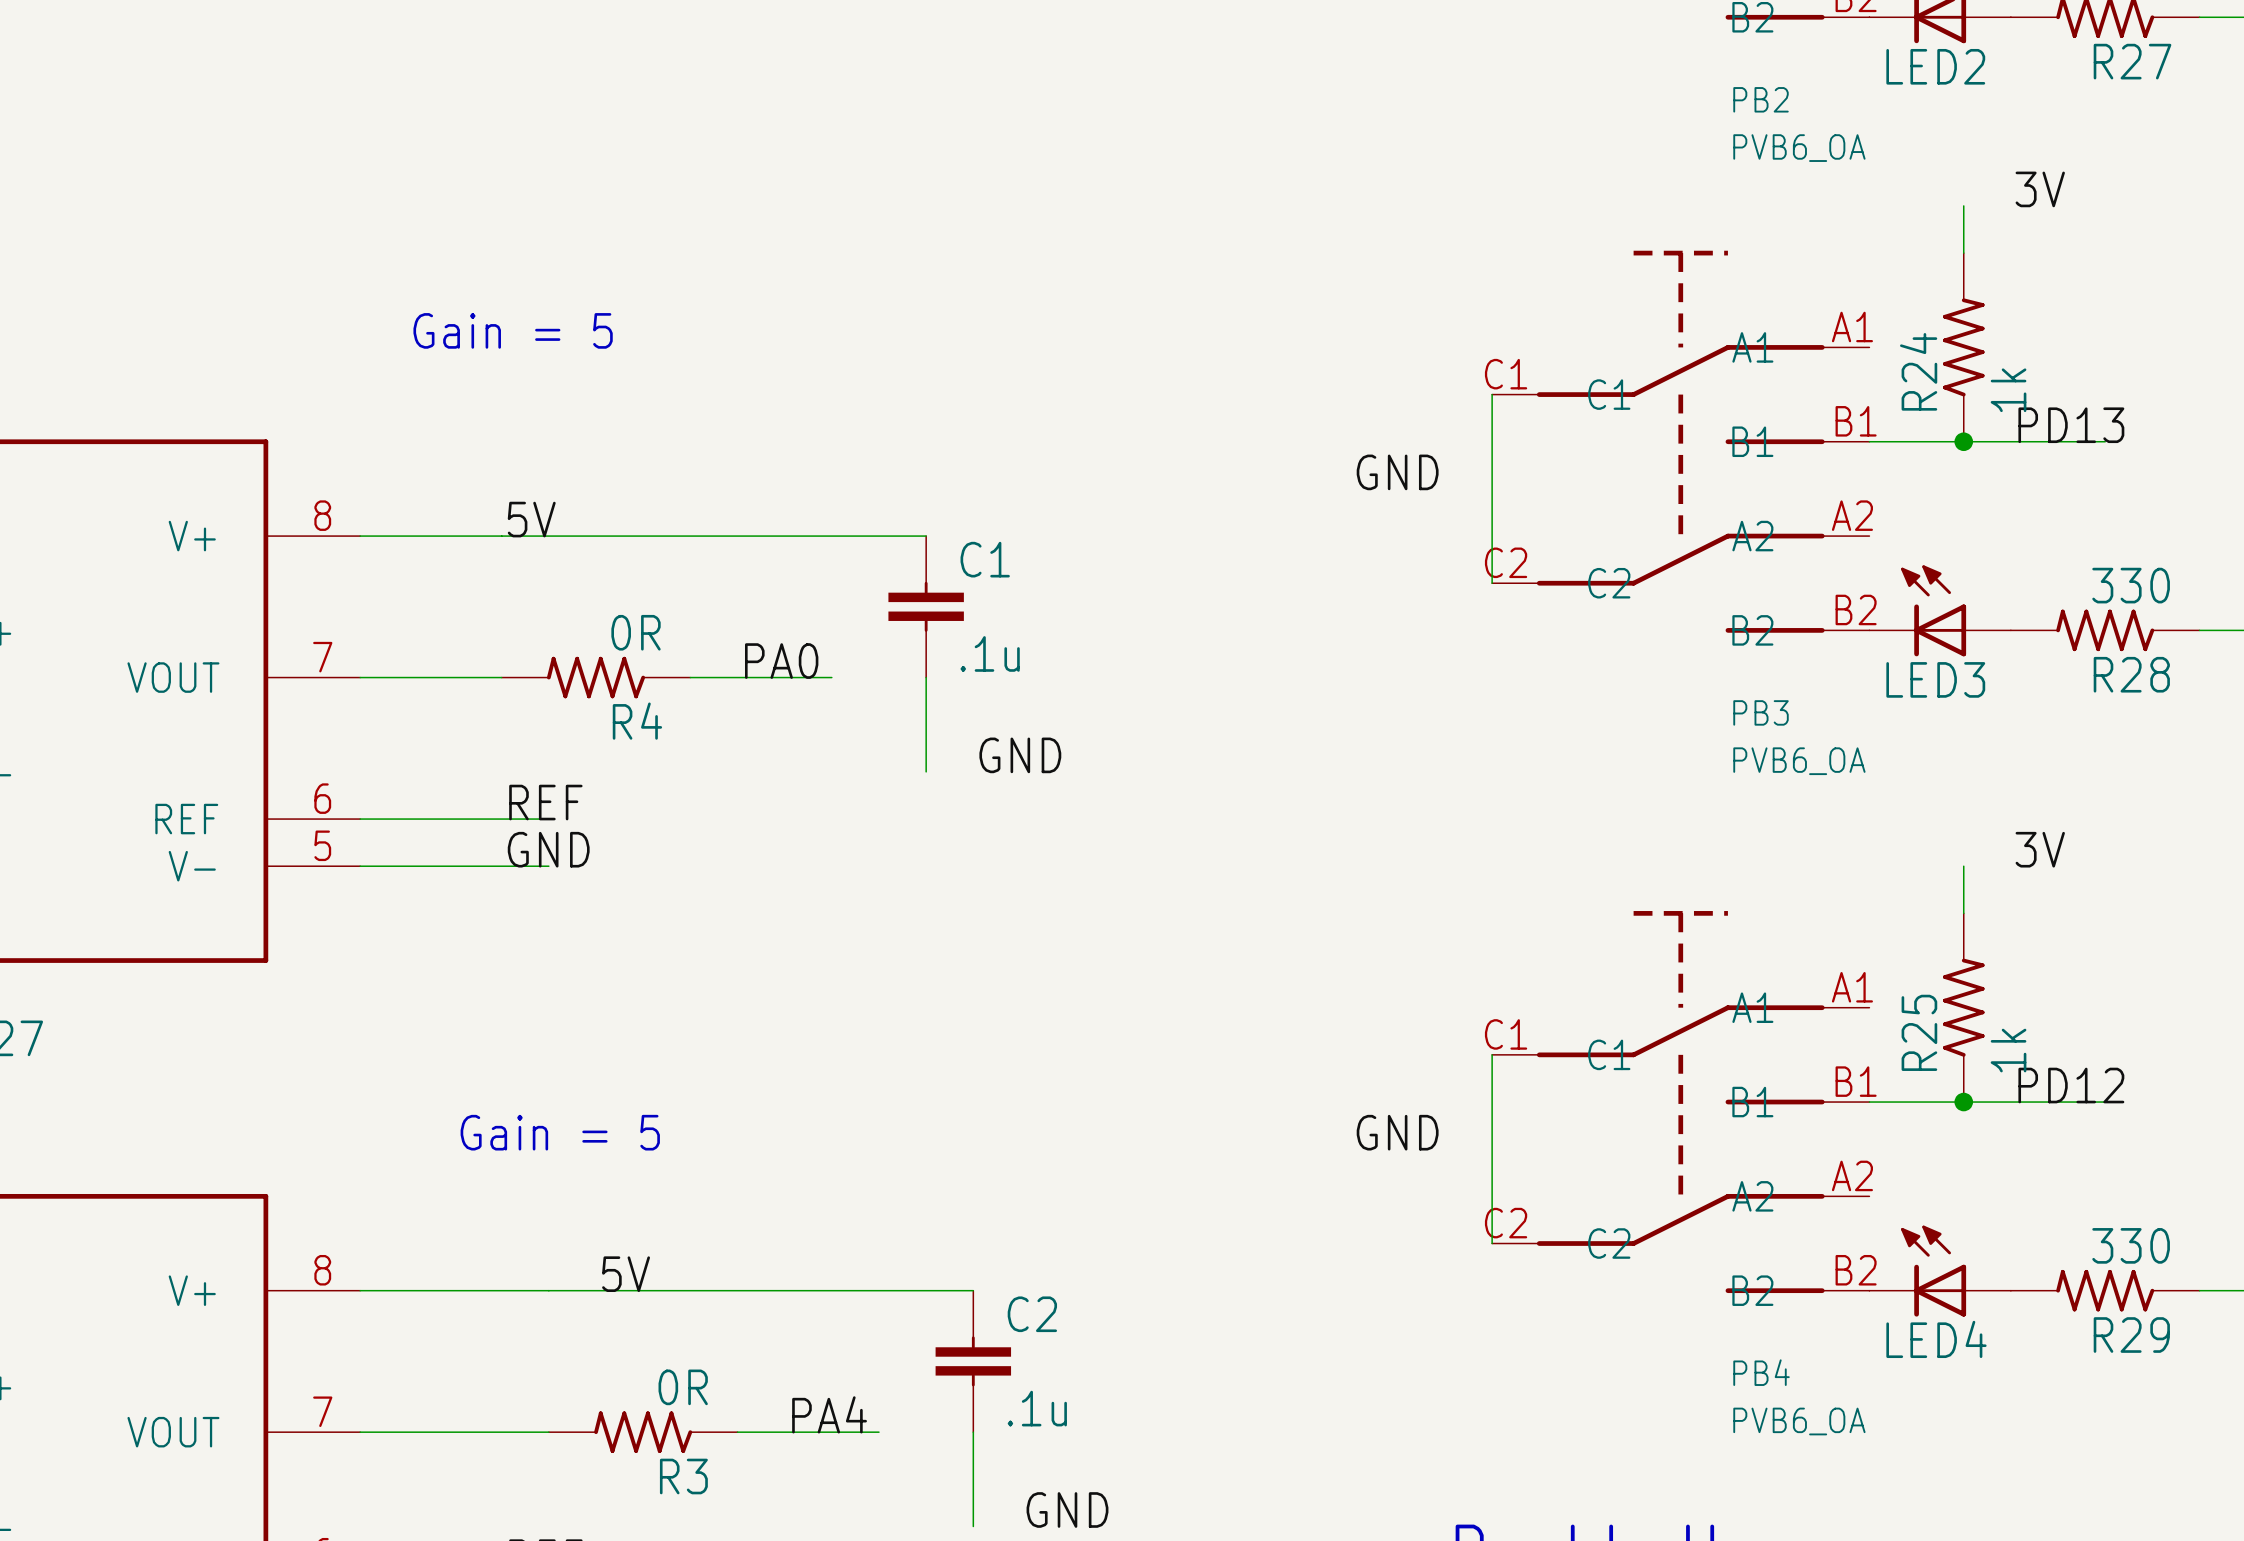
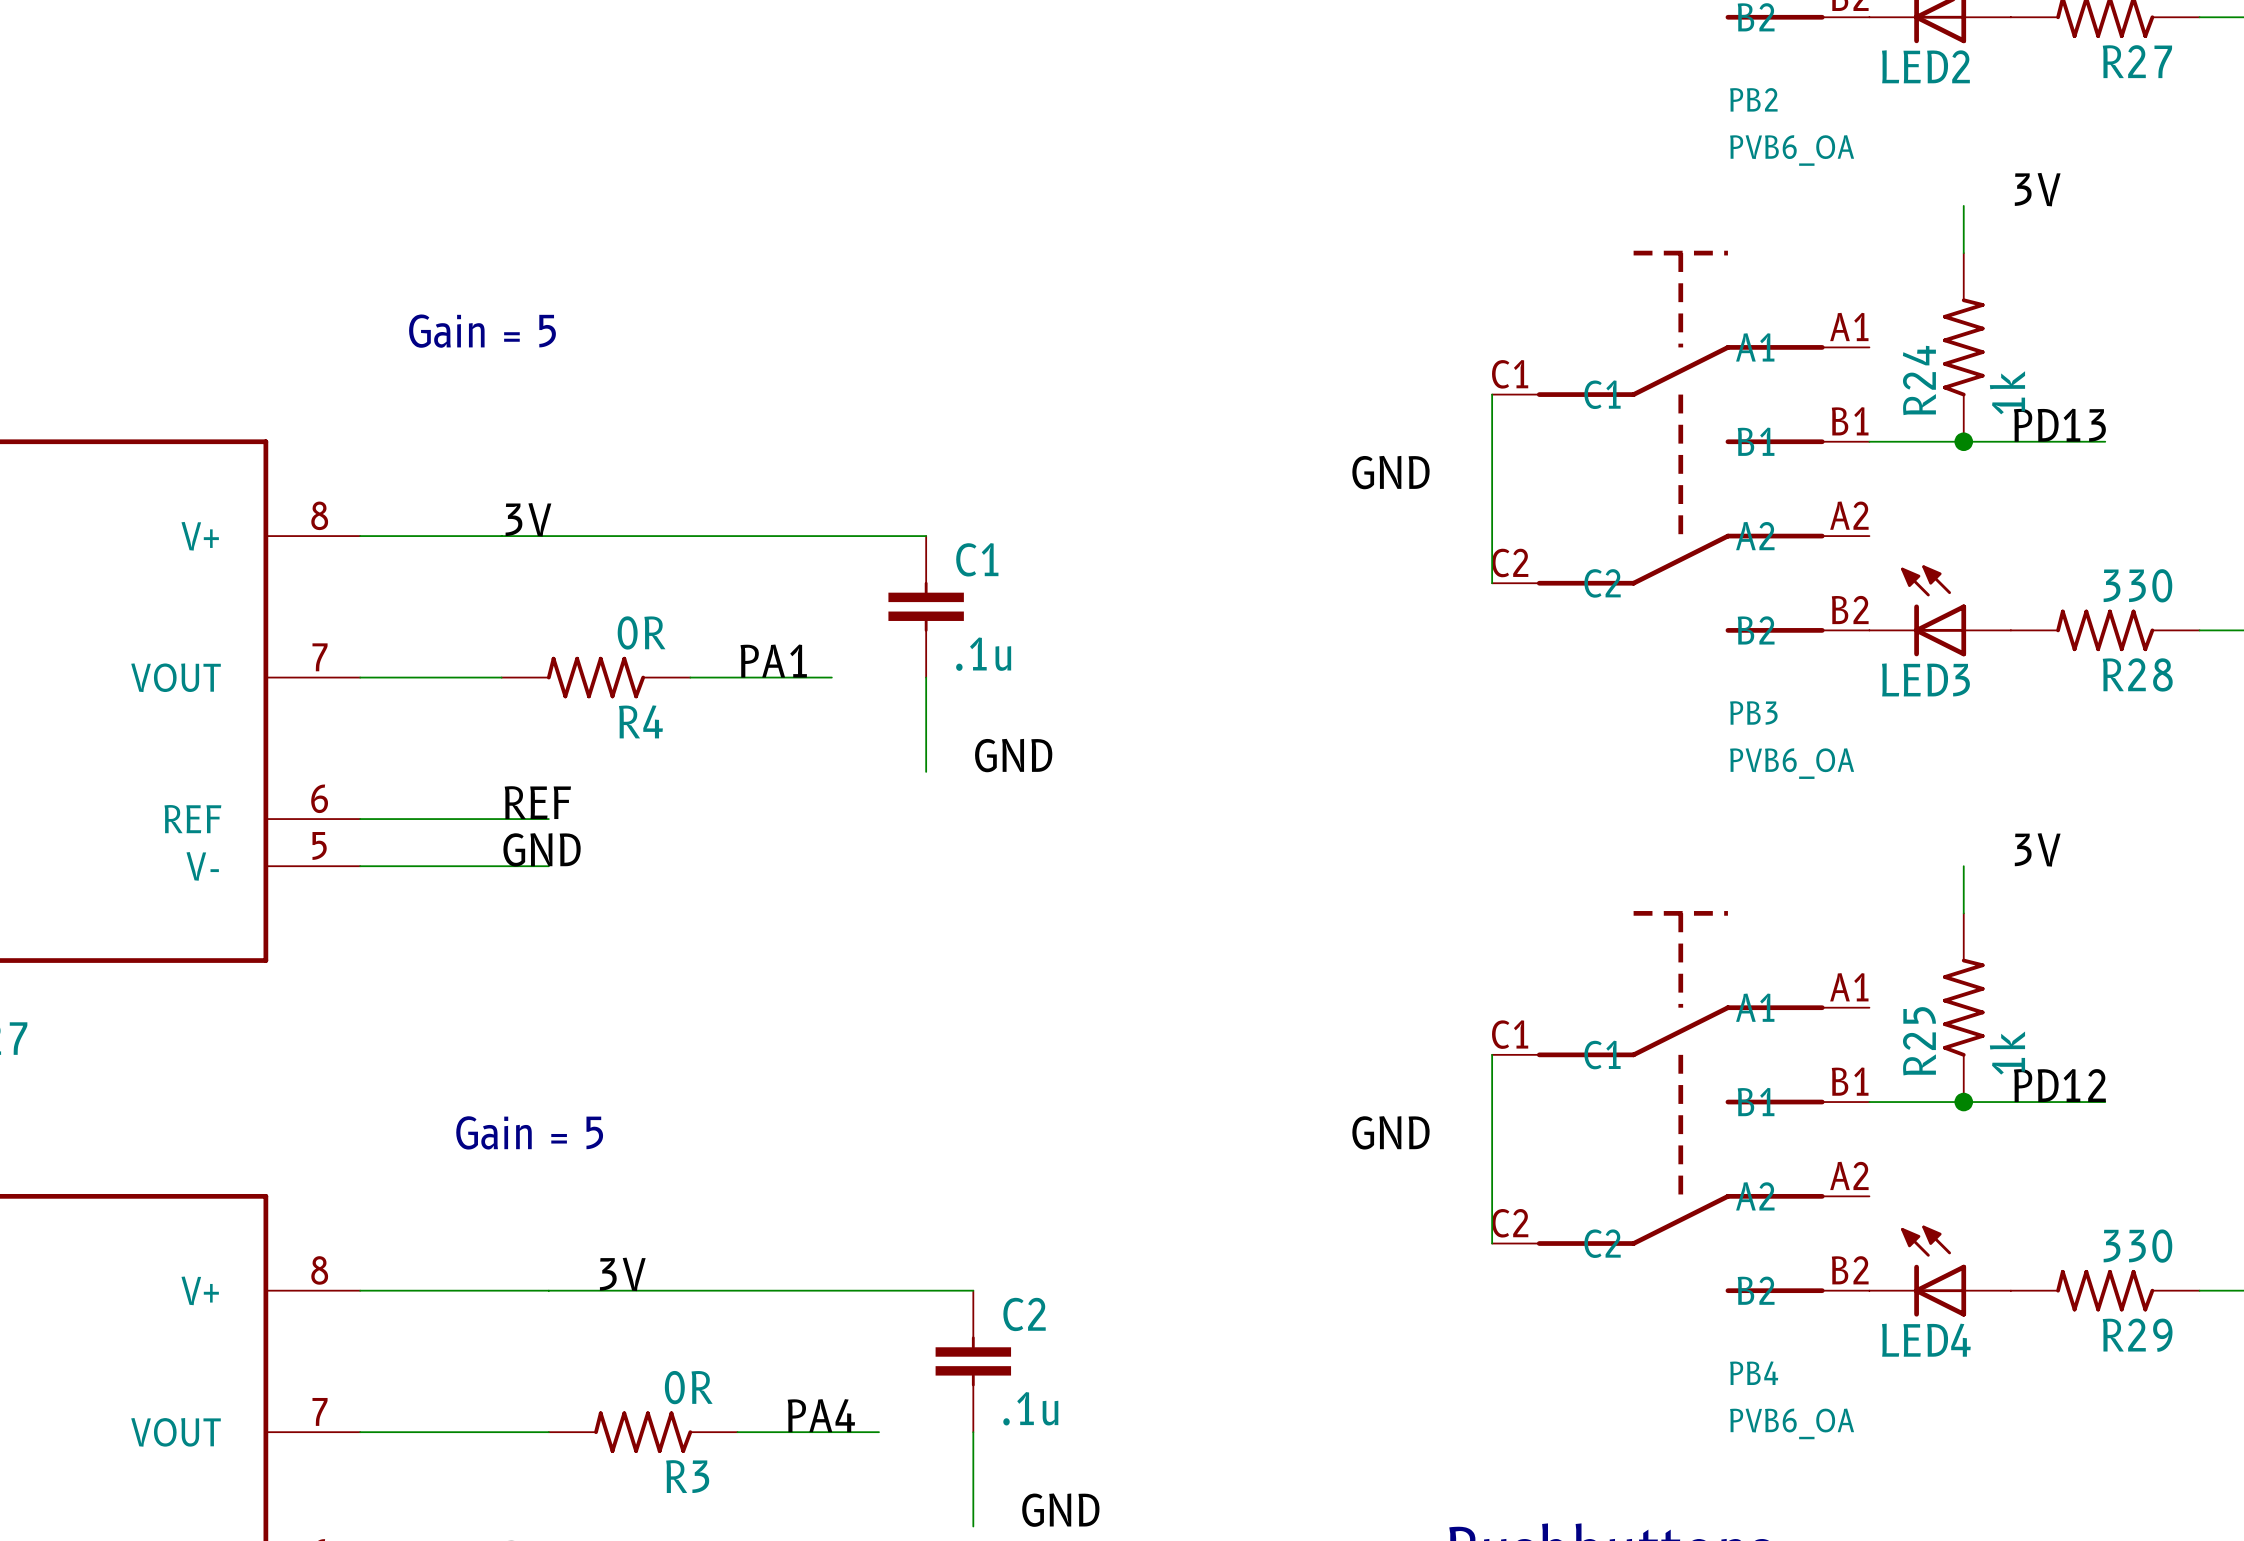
label: 5V (531, 519) -> 3V (528, 519)
label: PA0 (781, 661) -> PA1 (773, 661)
label: 5V (626, 1274) -> 3V (622, 1274)

